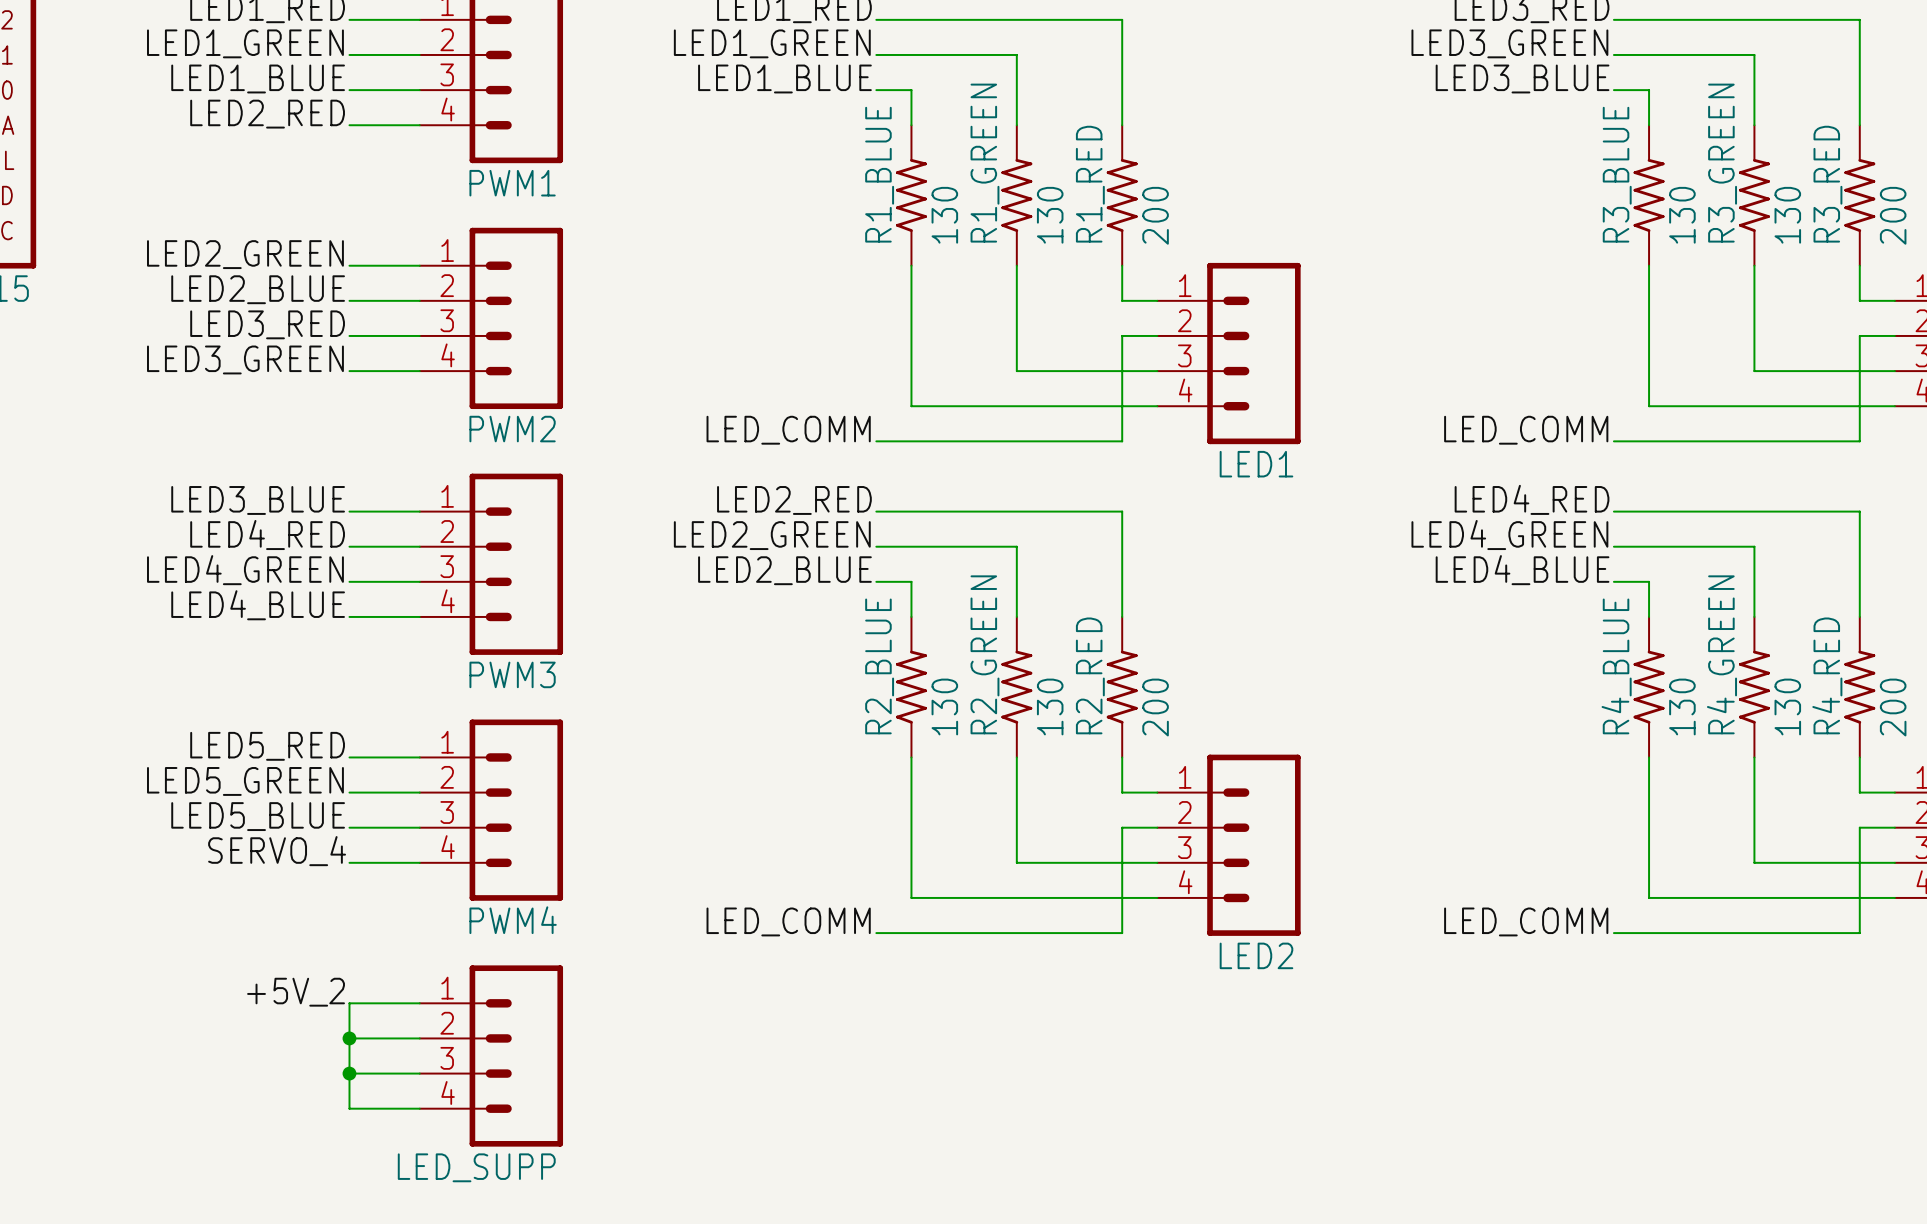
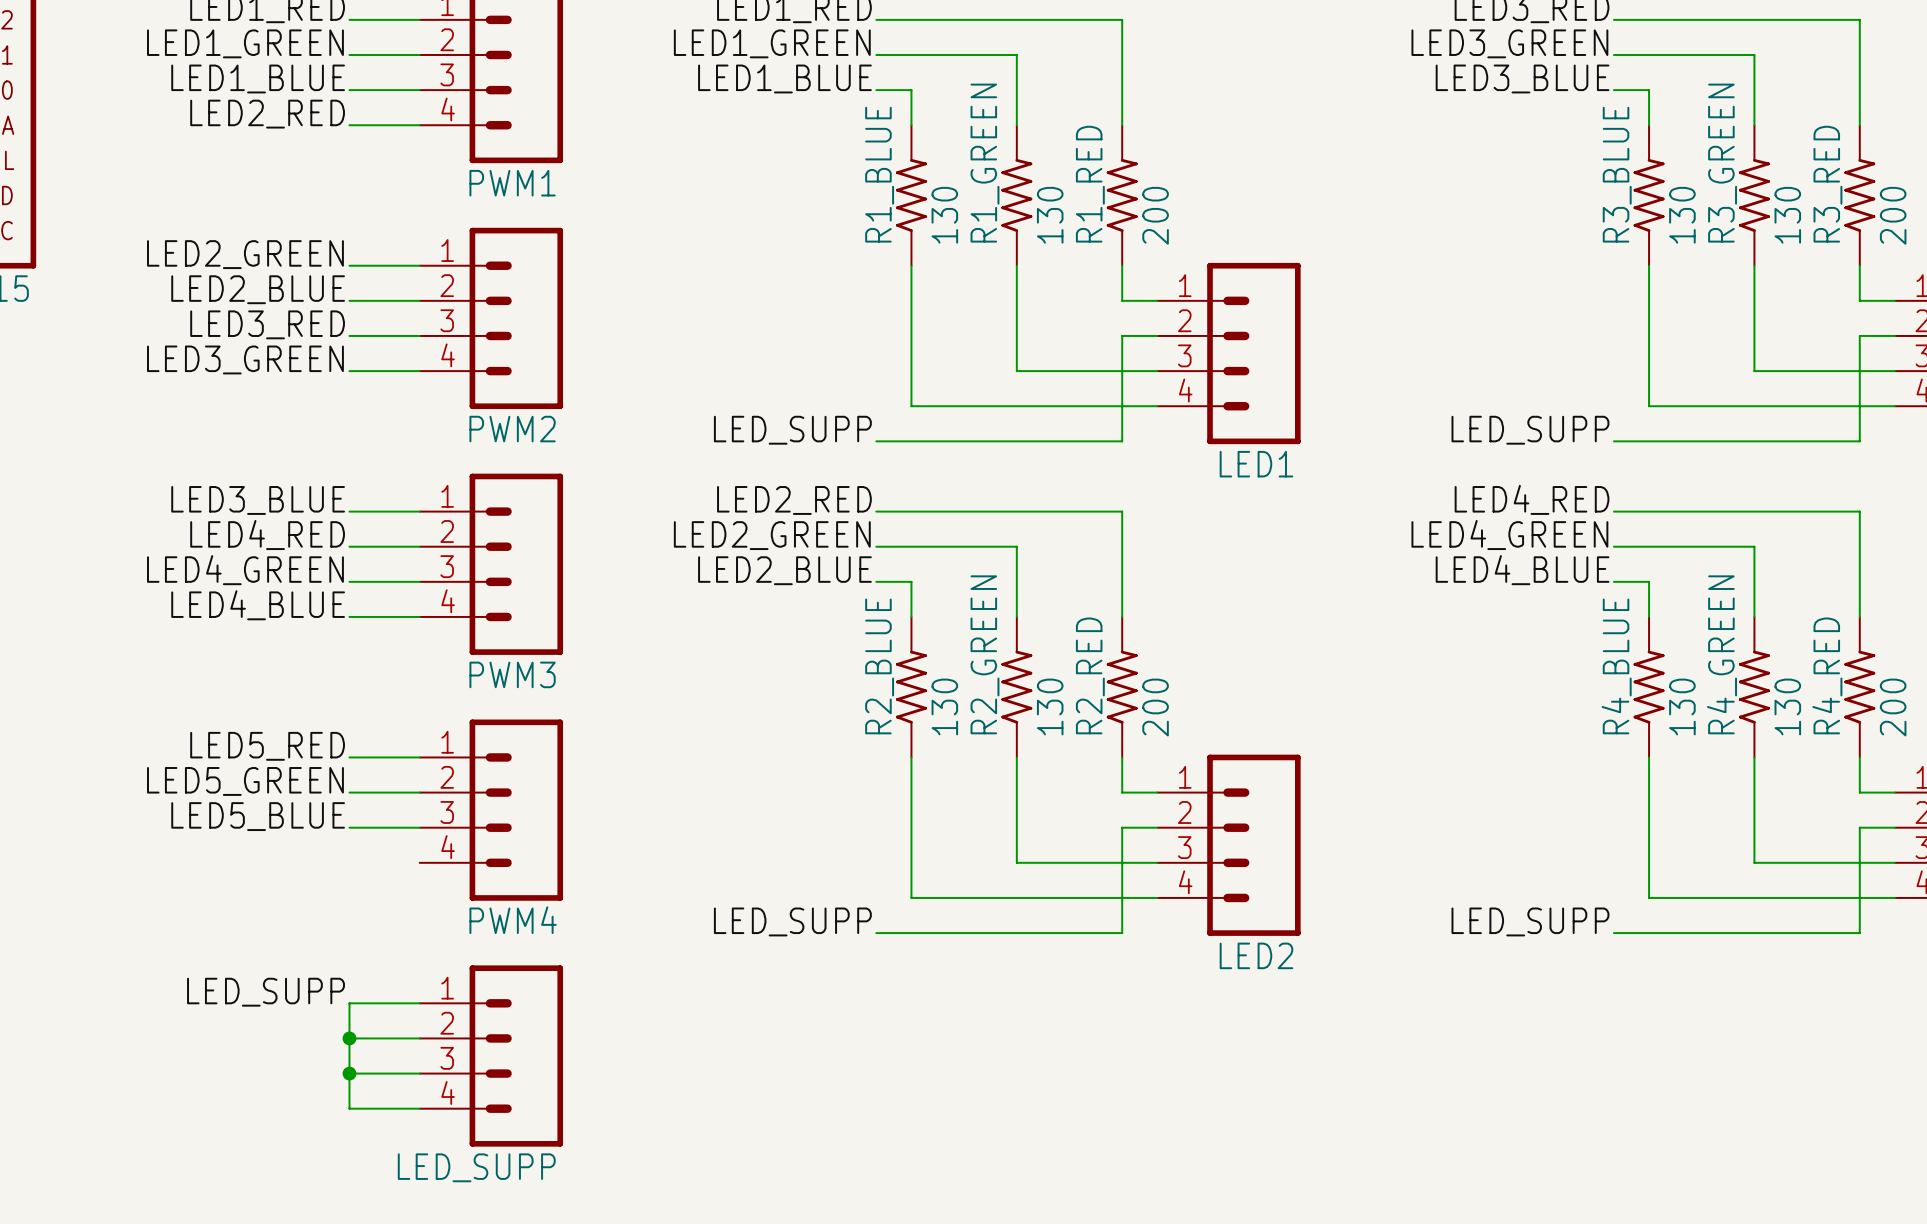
label: LED_COMM (788, 430) -> LED_SUPP (792, 430)
label: LED_COMM (1526, 430) -> LED_SUPP (1530, 430)
label: SERVO_4 (277, 851) -> none
wire: (349, 862) (419, 862) -> none
label: LED_COMM (788, 921) -> LED_SUPP (792, 921)
label: LED_COMM (1526, 921) -> LED_SUPP (1530, 921)
label: +5V_2 (296, 992) -> LED_SUPP (266, 992)

